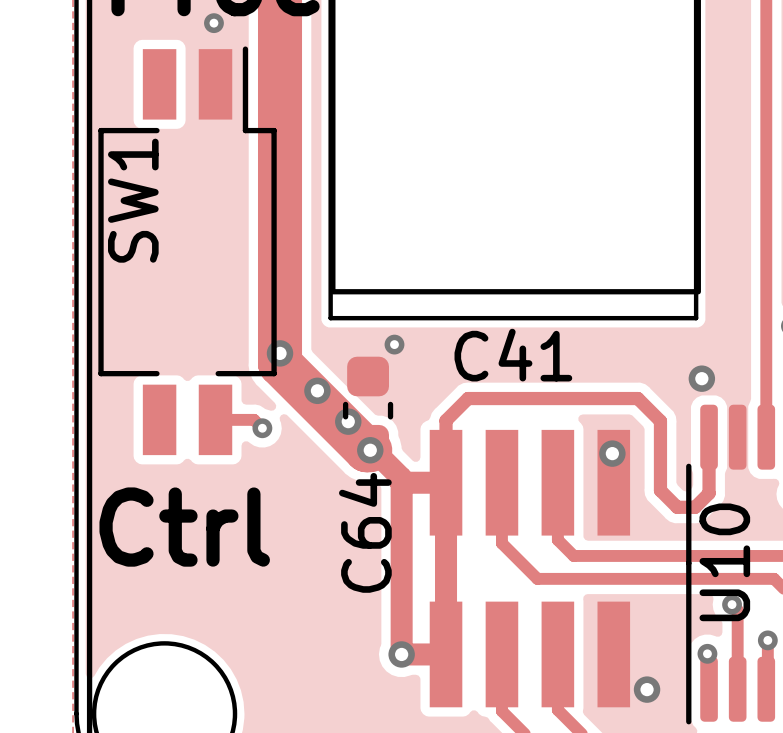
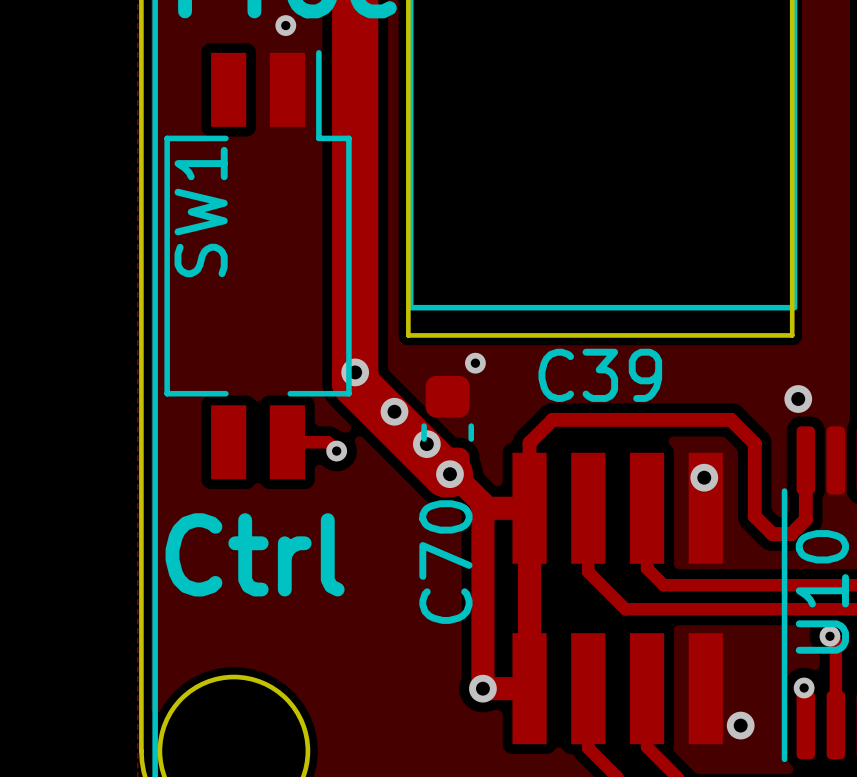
C41 name: C41 (513, 355) -> C39 (600, 375)
C64 name: C64 (365, 532) -> C70 (445, 562)

